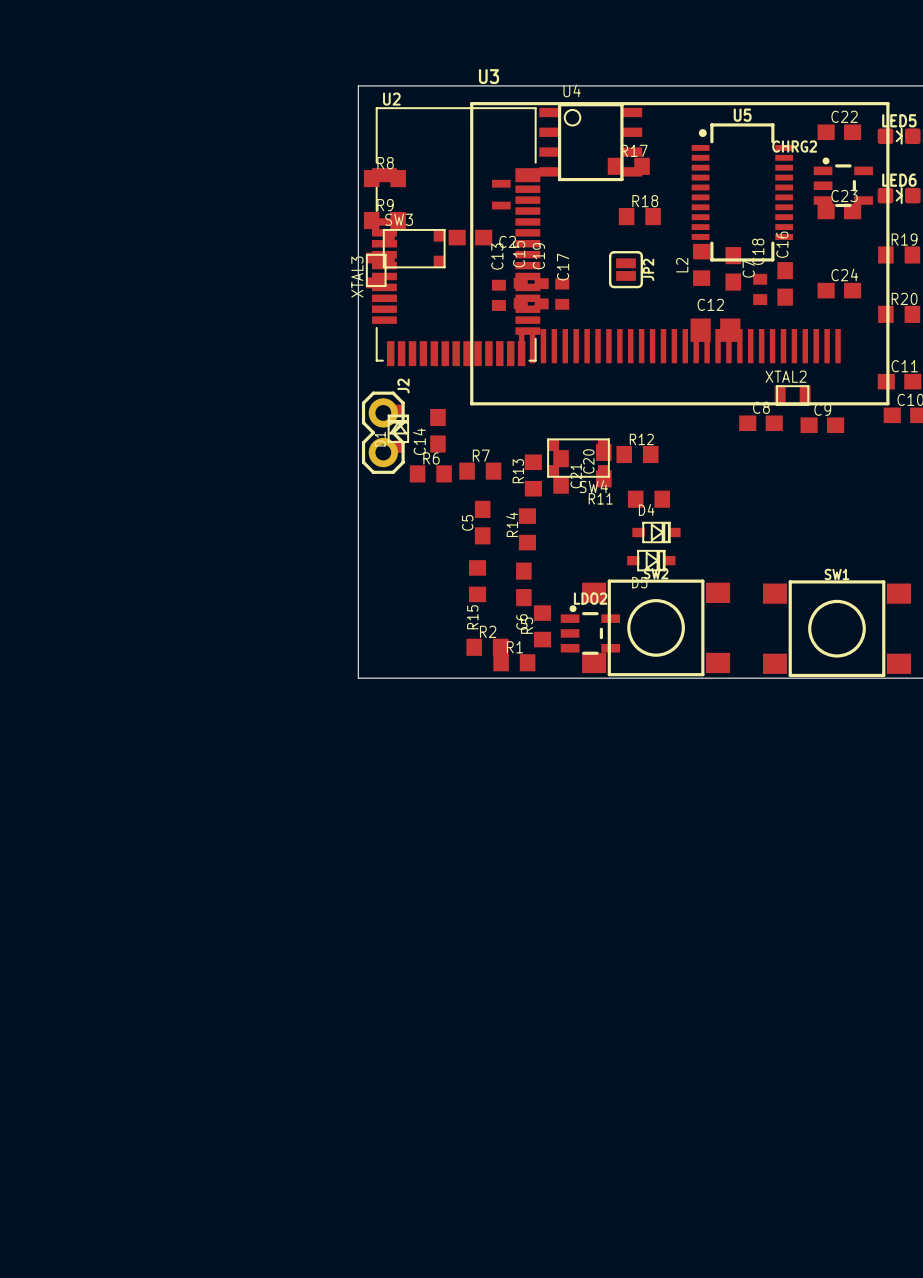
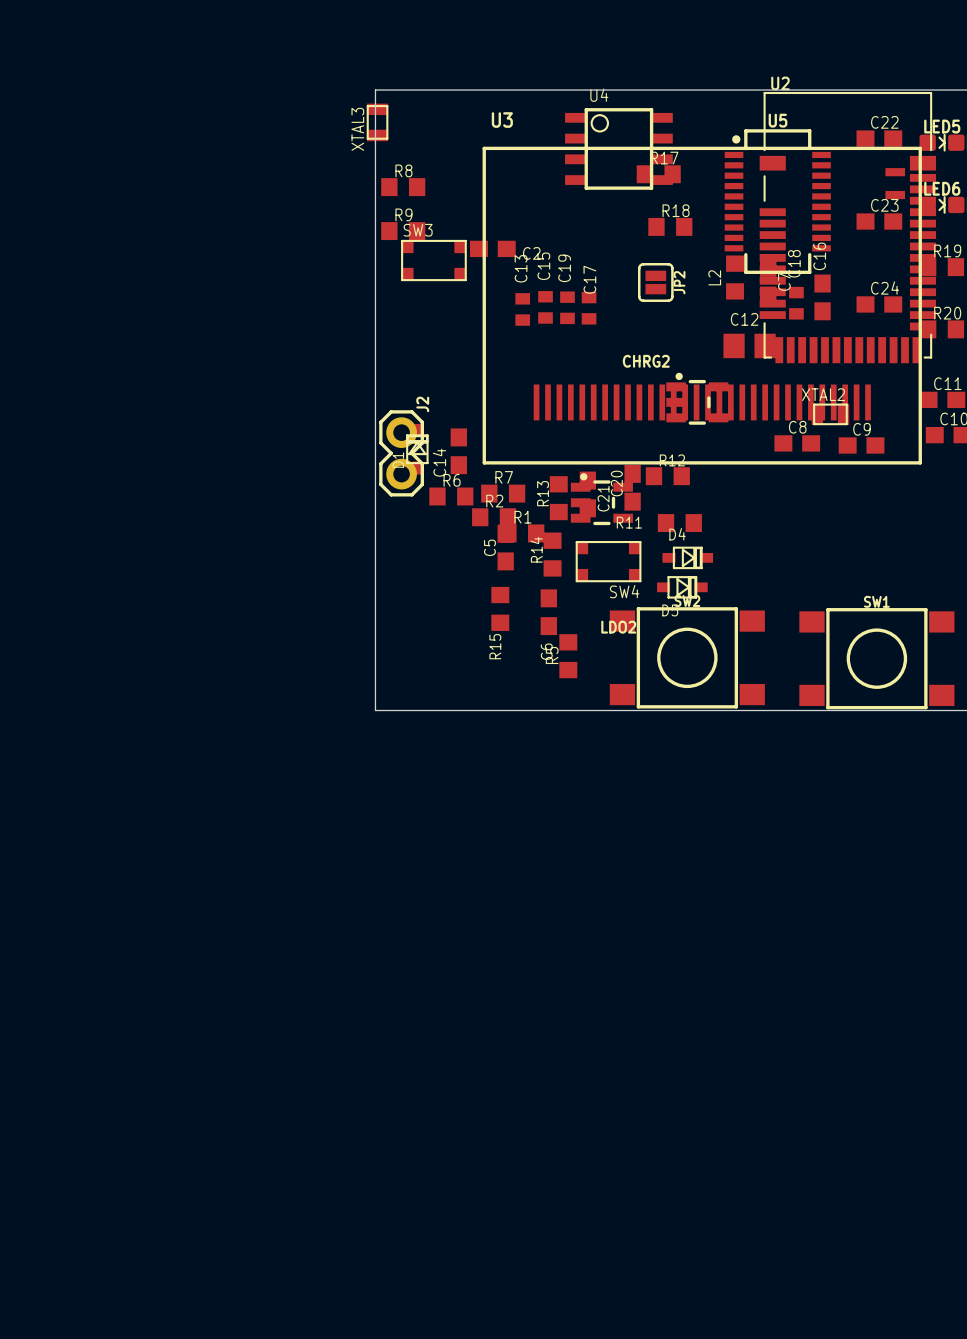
CHRG2 position: (843, 182) -> (697, 398)
U2 position: (456, 236) -> (847, 227)
U3 position: (679, 253) -> (702, 305)
XTAL3 position: (376, 270) -> (377, 122)
SW4 position: (578, 458) -> (608, 561)
LDO2 position: (590, 630) -> (601, 499)
R2 position: (487, 647) -> (494, 517)
R1 position: (514, 662) -> (522, 533)

